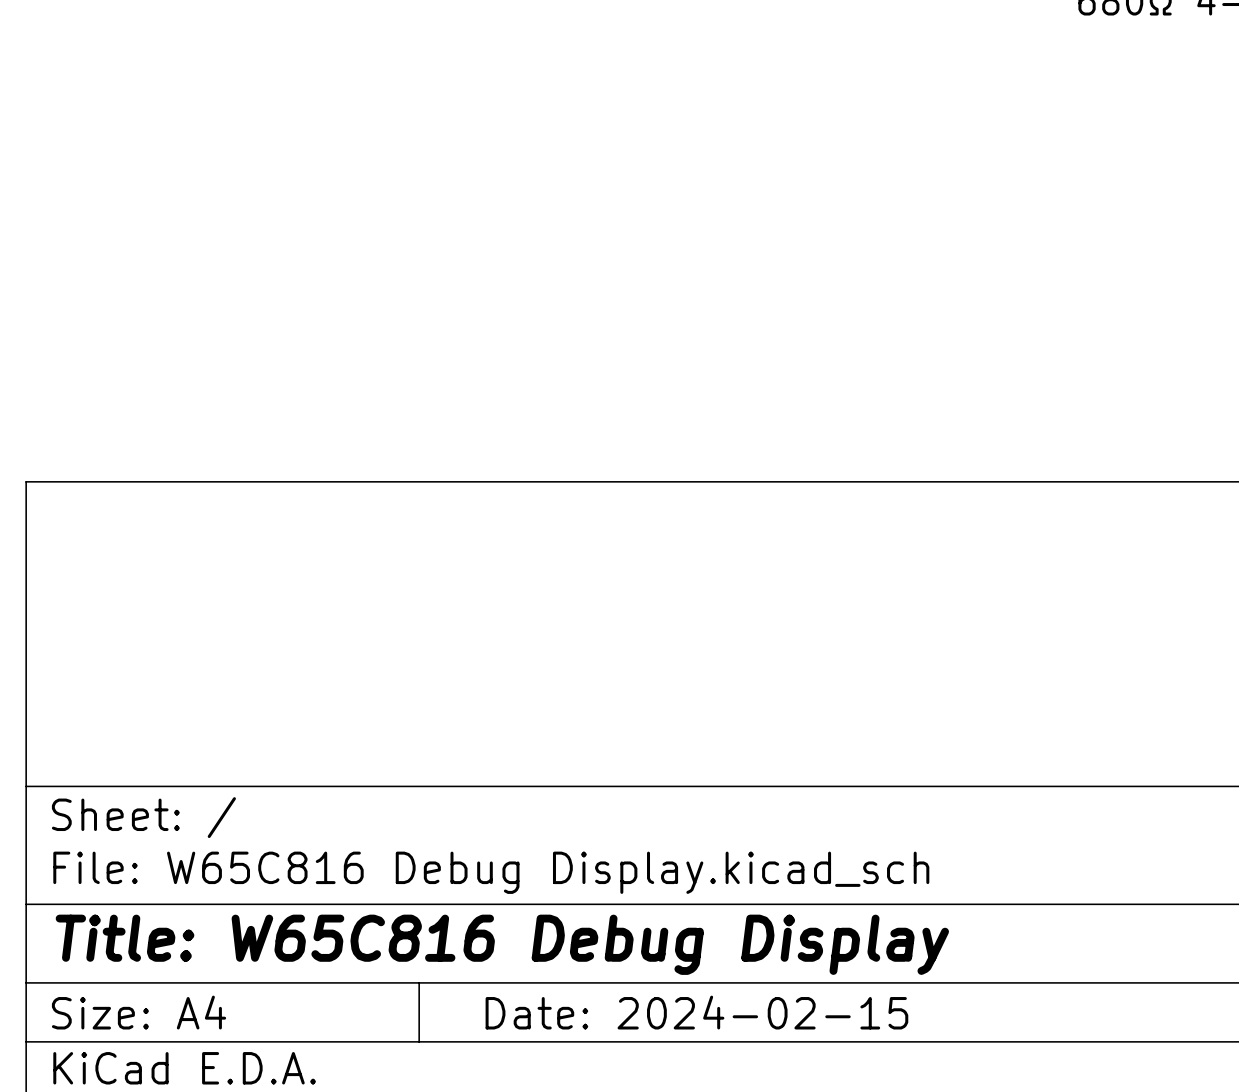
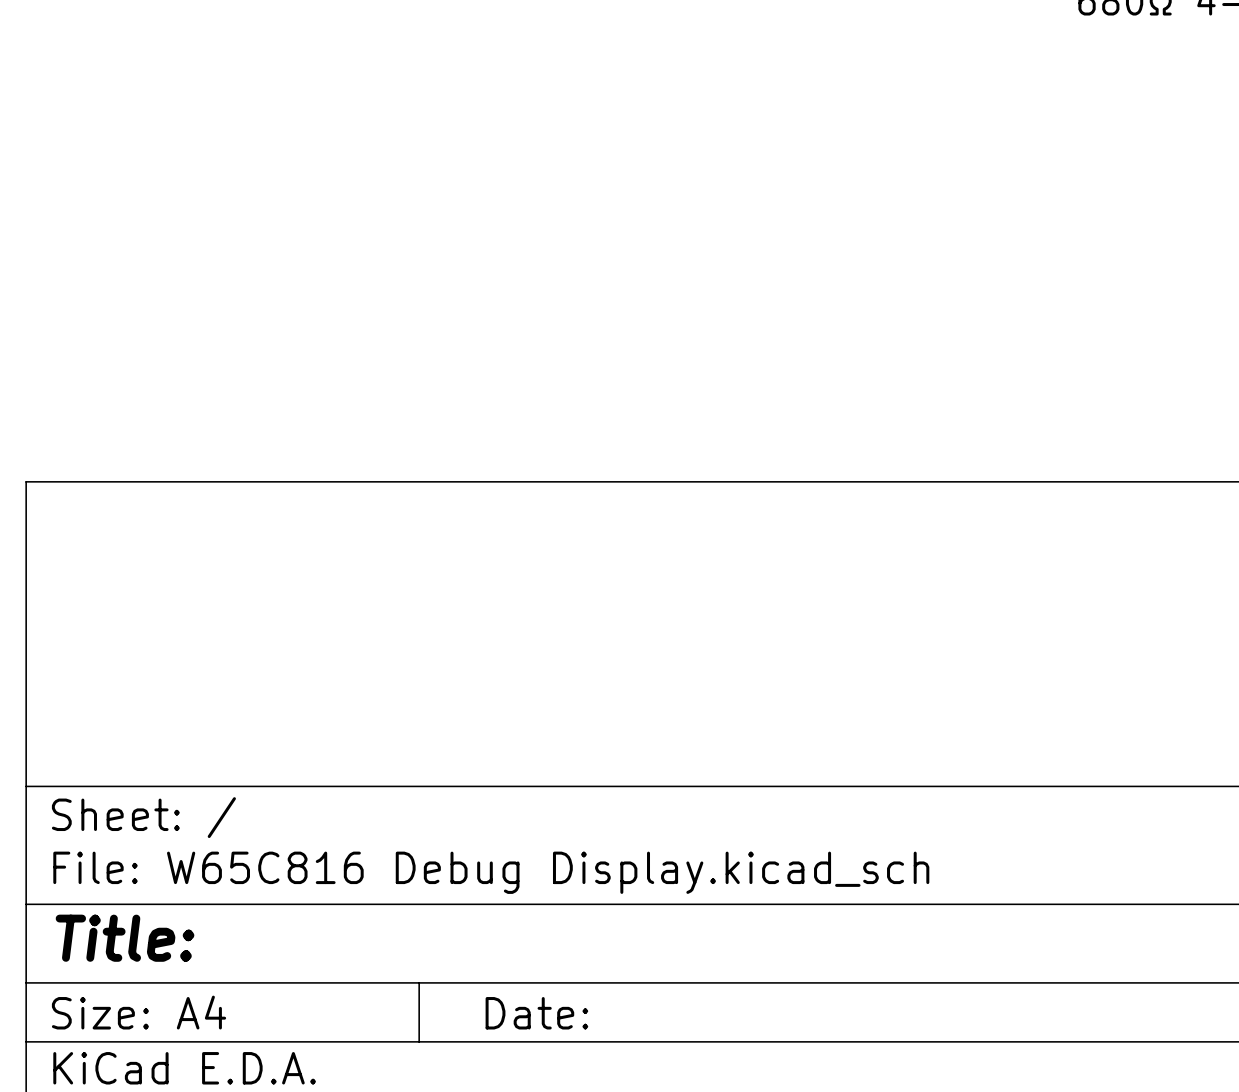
title block: Title: W65C816 Debug Display (502, 944) -> Title: (125, 938)
title block: Date: 2024-02-15 (696, 1012) -> Date: (536, 1013)

